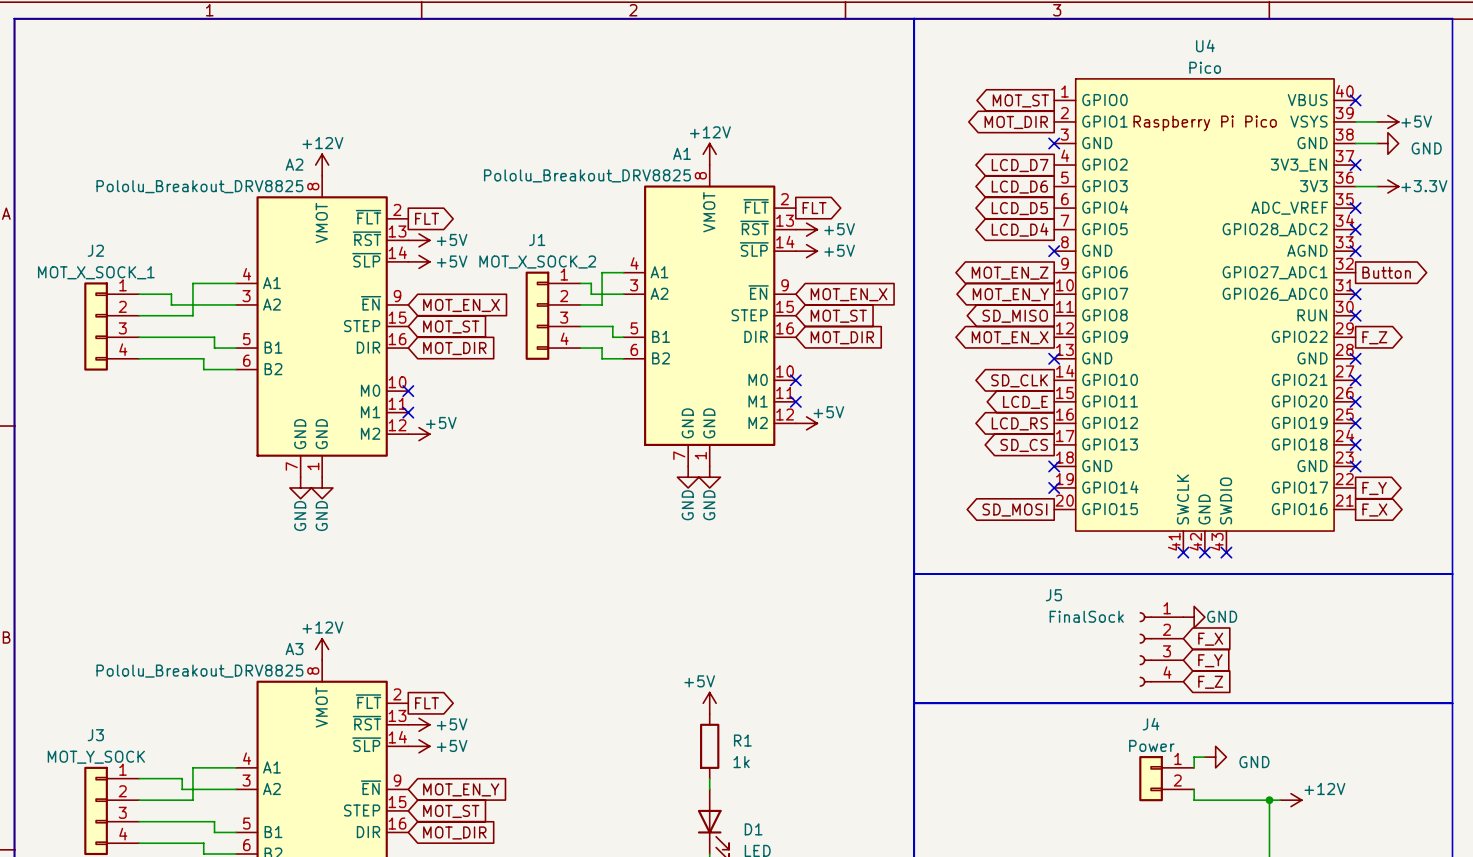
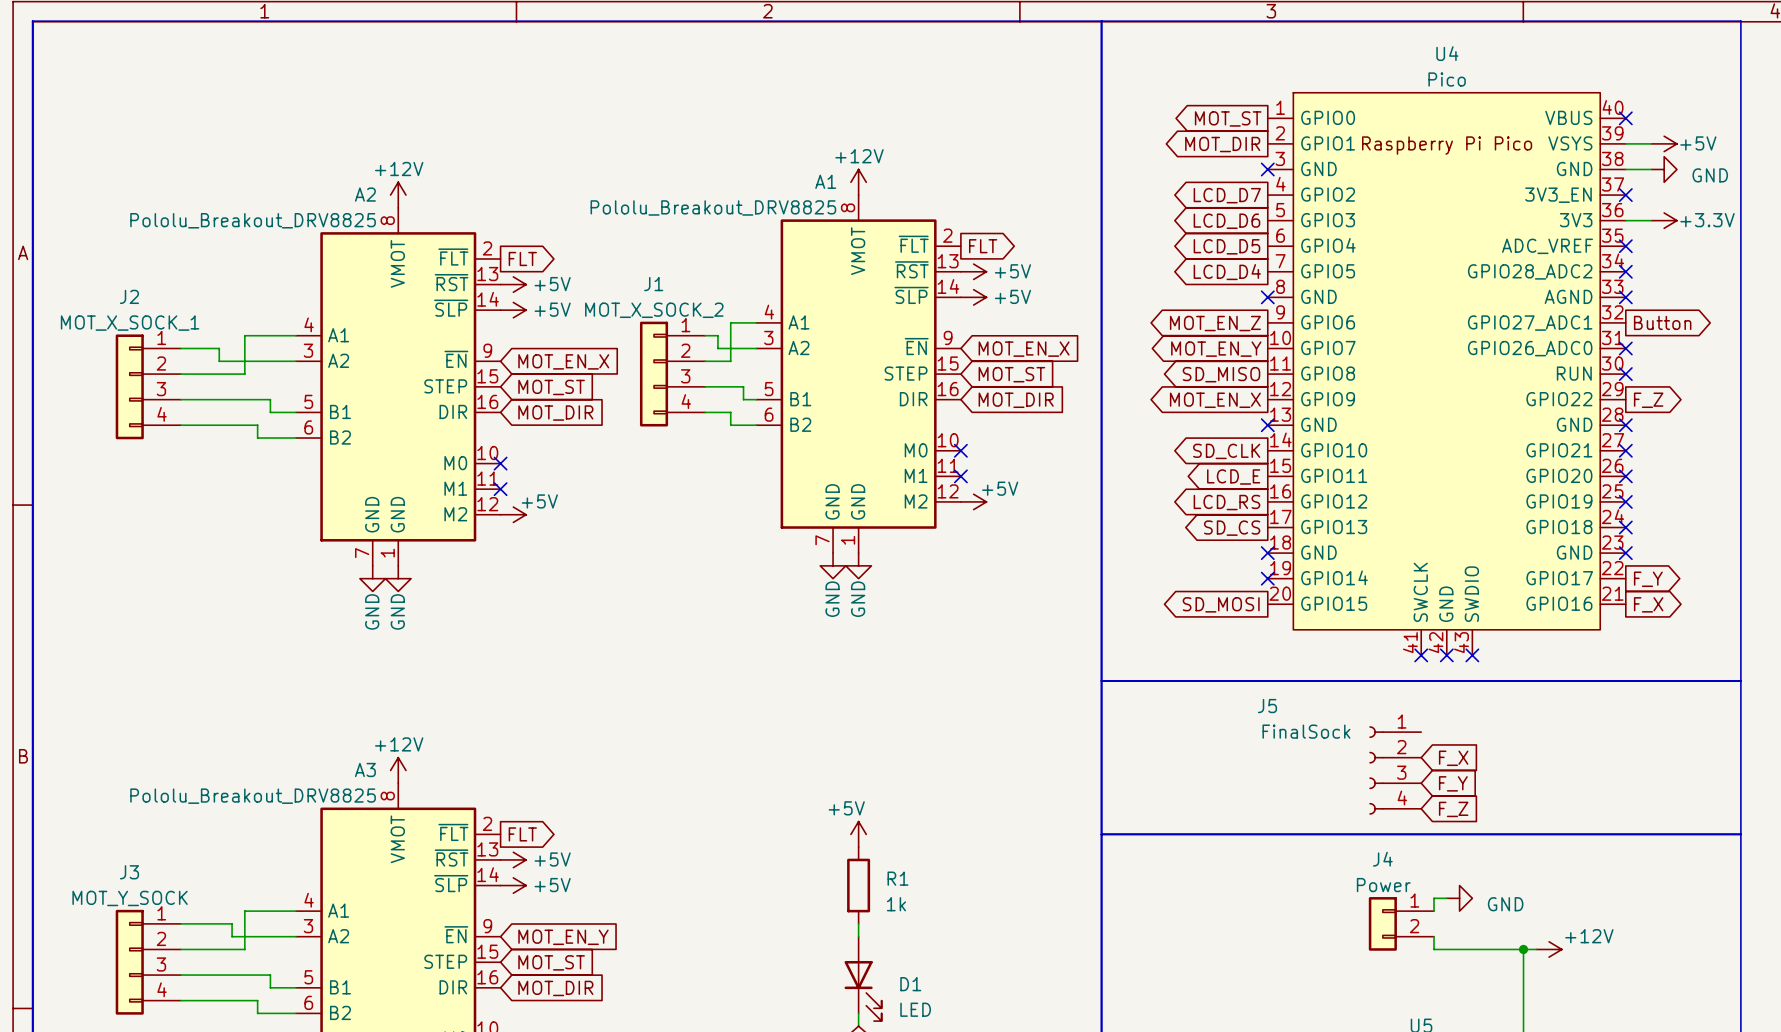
power symbol: GND (1194, 617) -> none

